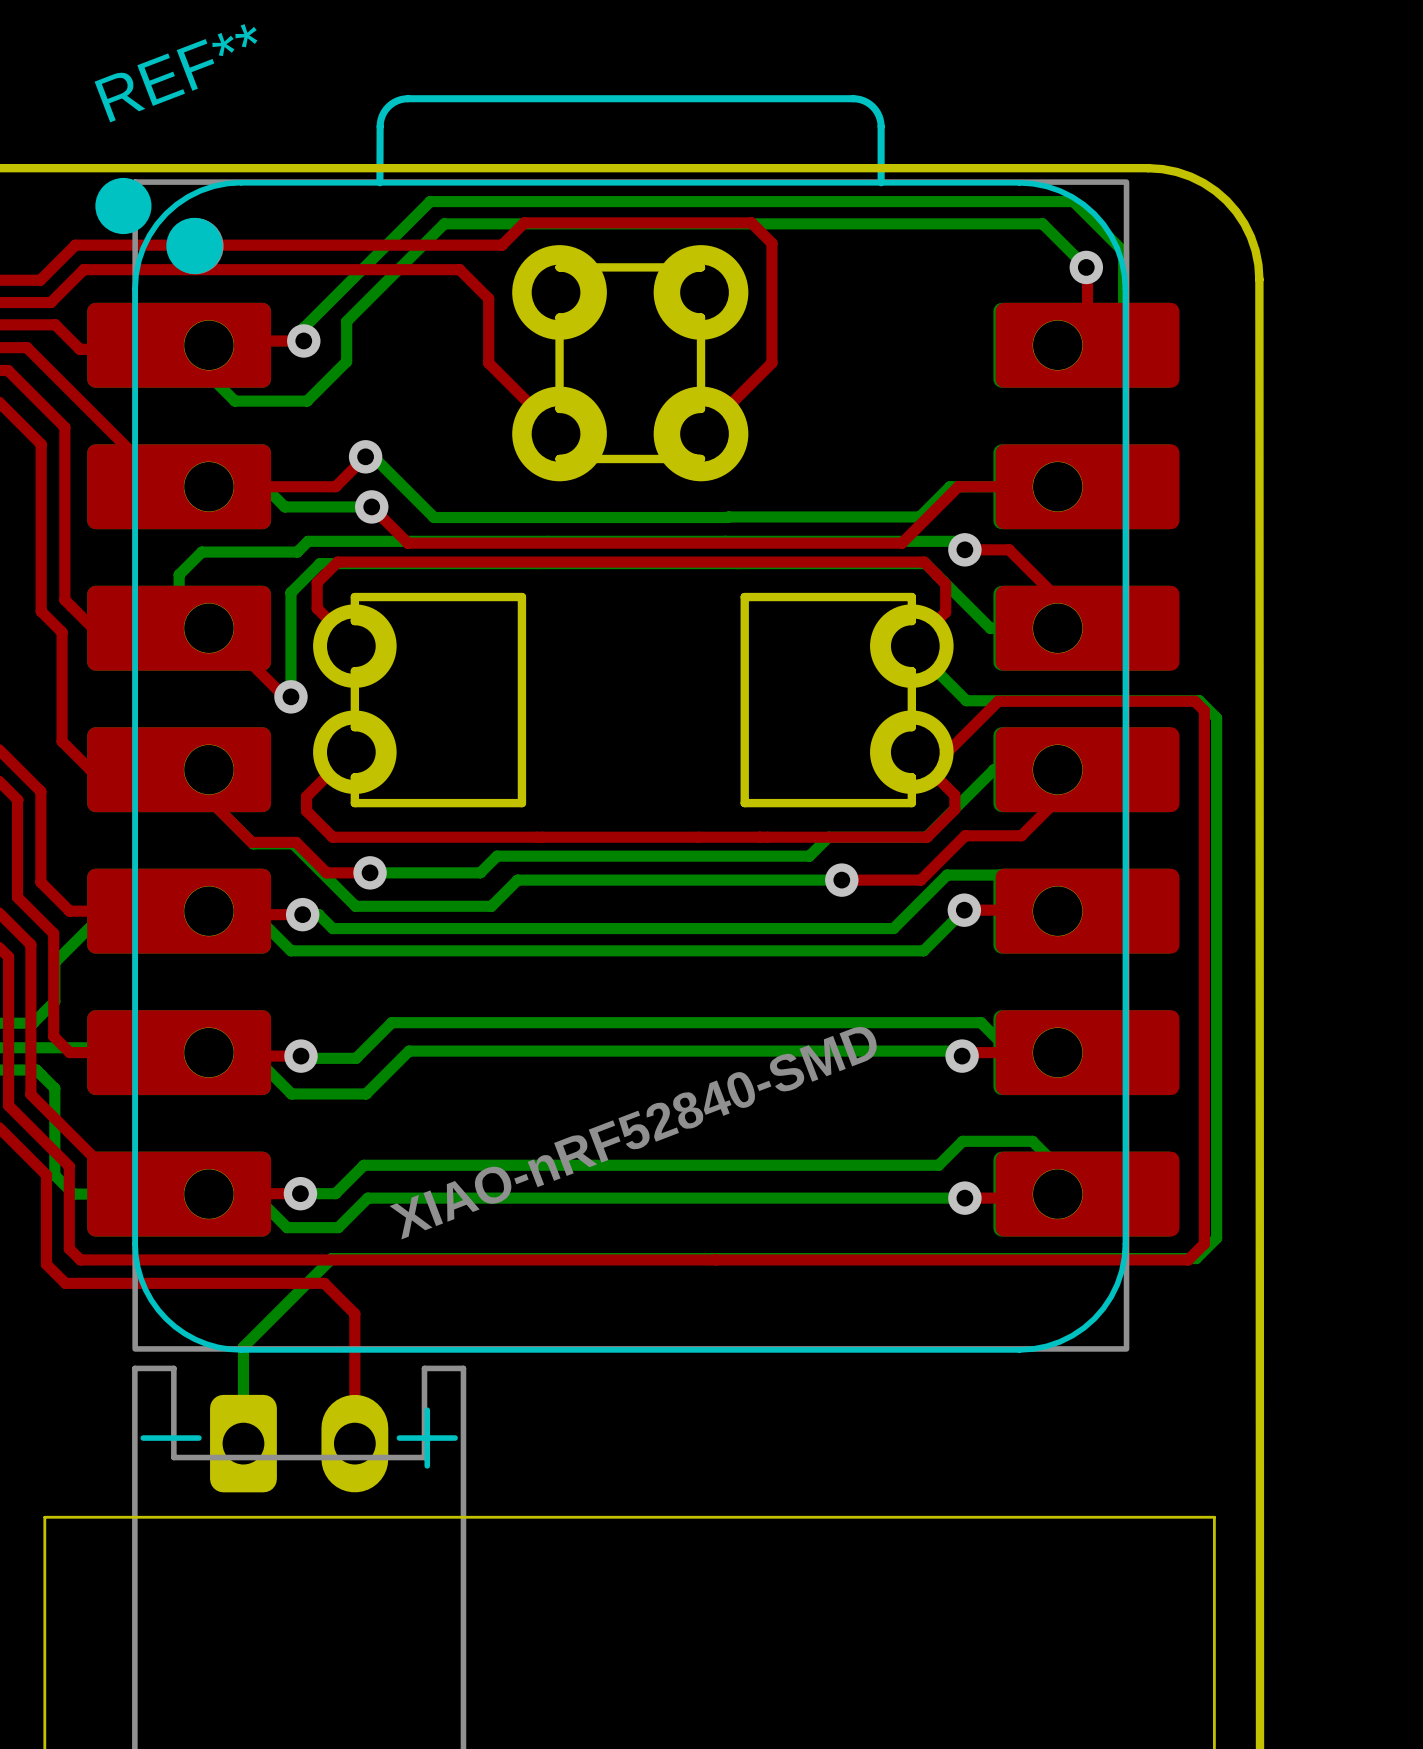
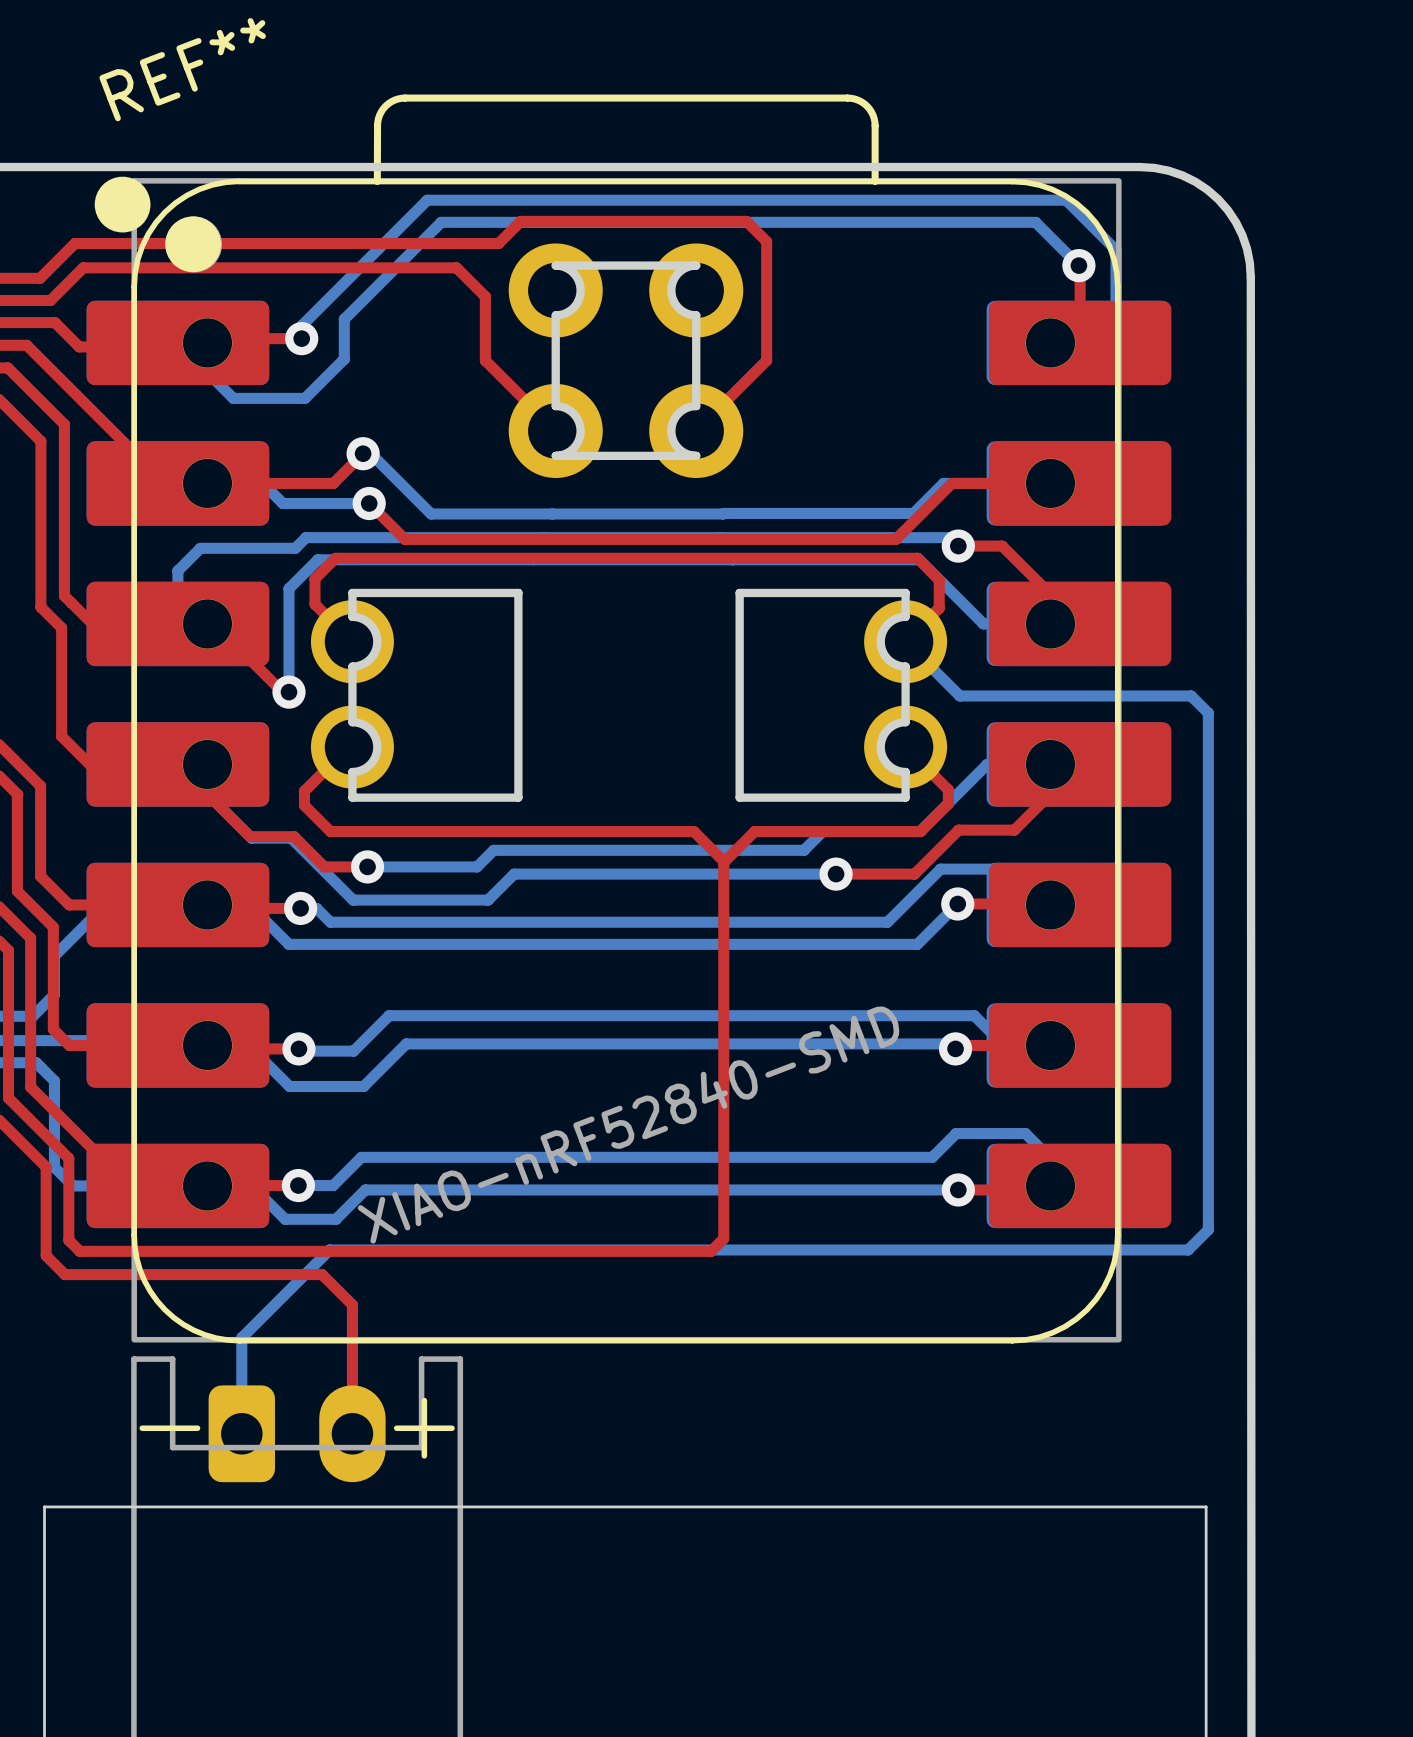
top track: (911, 752) (947, 752) (998, 701) (1194, 701) (1204, 710) (1204, 1243) (1188, 1259) (715, 1259) -> (693, 831) (723, 861) (723, 1238) (711, 1251)
top track: (698, 837) (759, 837) -> (723, 862) (754, 831)

